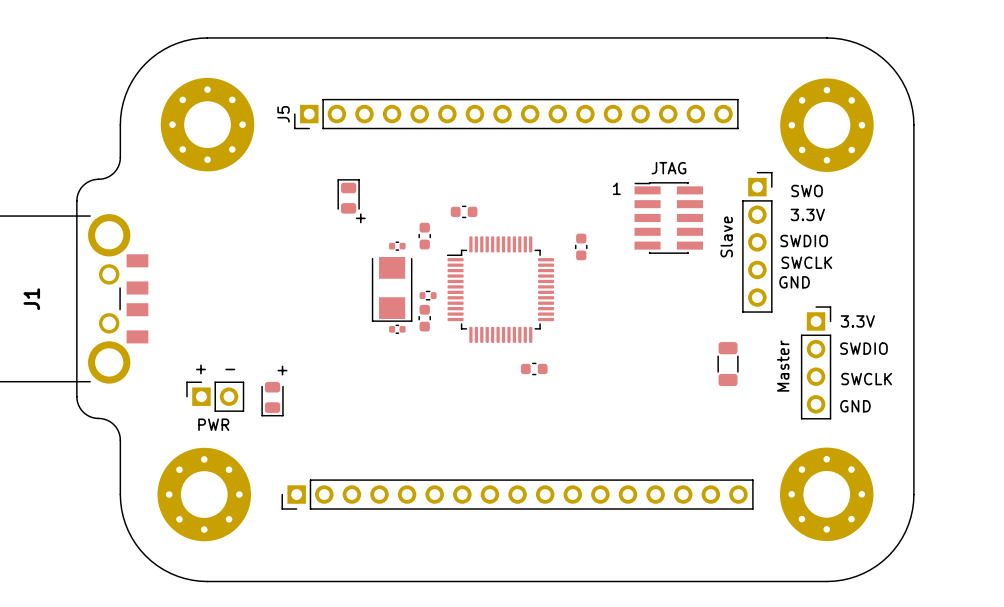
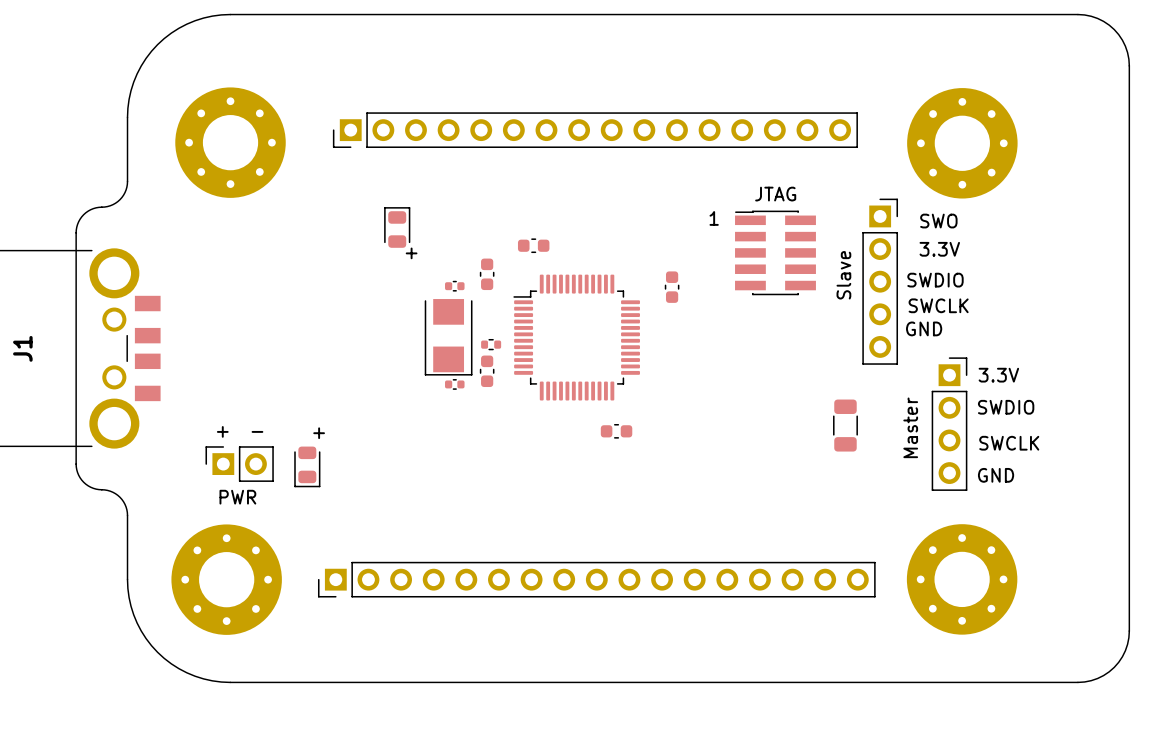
J5 name: J5 (283, 114) -> none
board edge: (120, 124) (125, 95) (131, 81) (145, 63) (170, 46) (199, 38) (826, 37) (856, 43) (876, 53) (893, 69) (902, 81) (908, 95) (913, 117) (913, 502) (905, 531) (898, 544) (882, 561) (856, 576) (826, 581) -> (127, 142) (129, 99) (133, 82) (146, 58) (157, 44) (178, 28) (203, 18) (221, 14) (1077, 14) (1091, 16) (1103, 21) (1114, 29) (1122, 40) (1127, 52) (1129, 65) (1129, 631) (1127, 644) (1122, 656) (1114, 667) (1103, 675) (1091, 680) (1077, 682) (962, 682)

